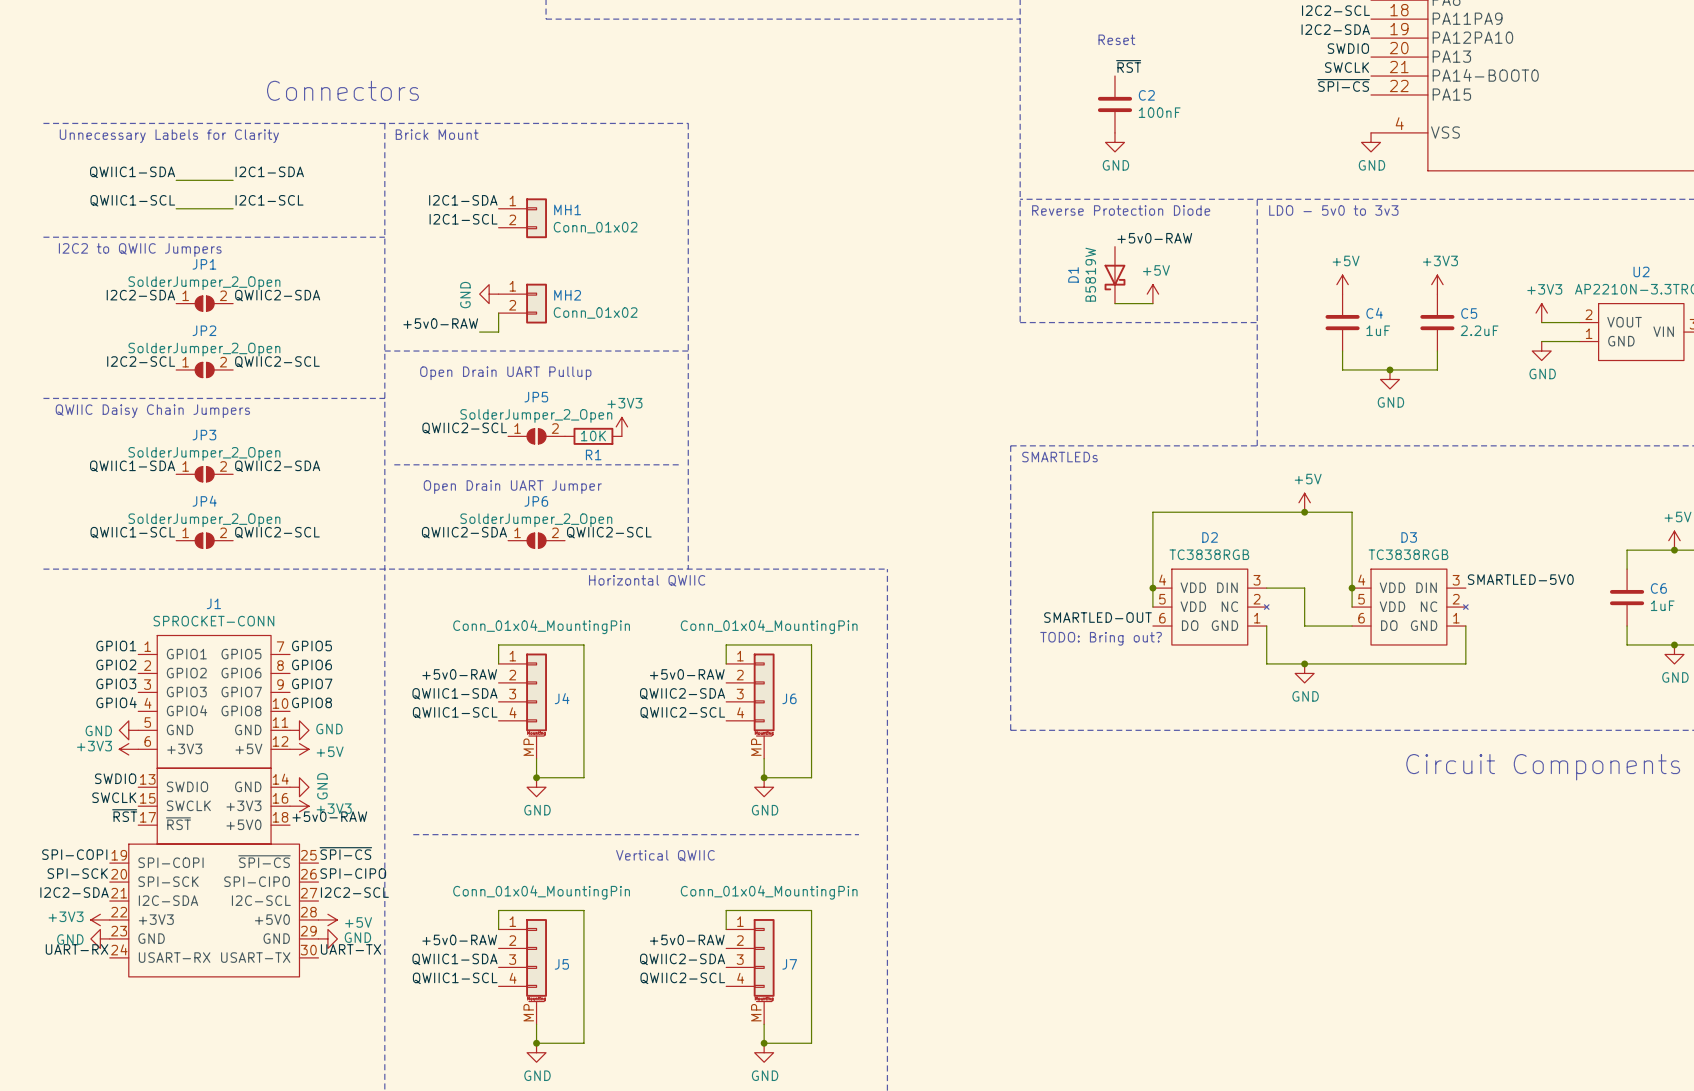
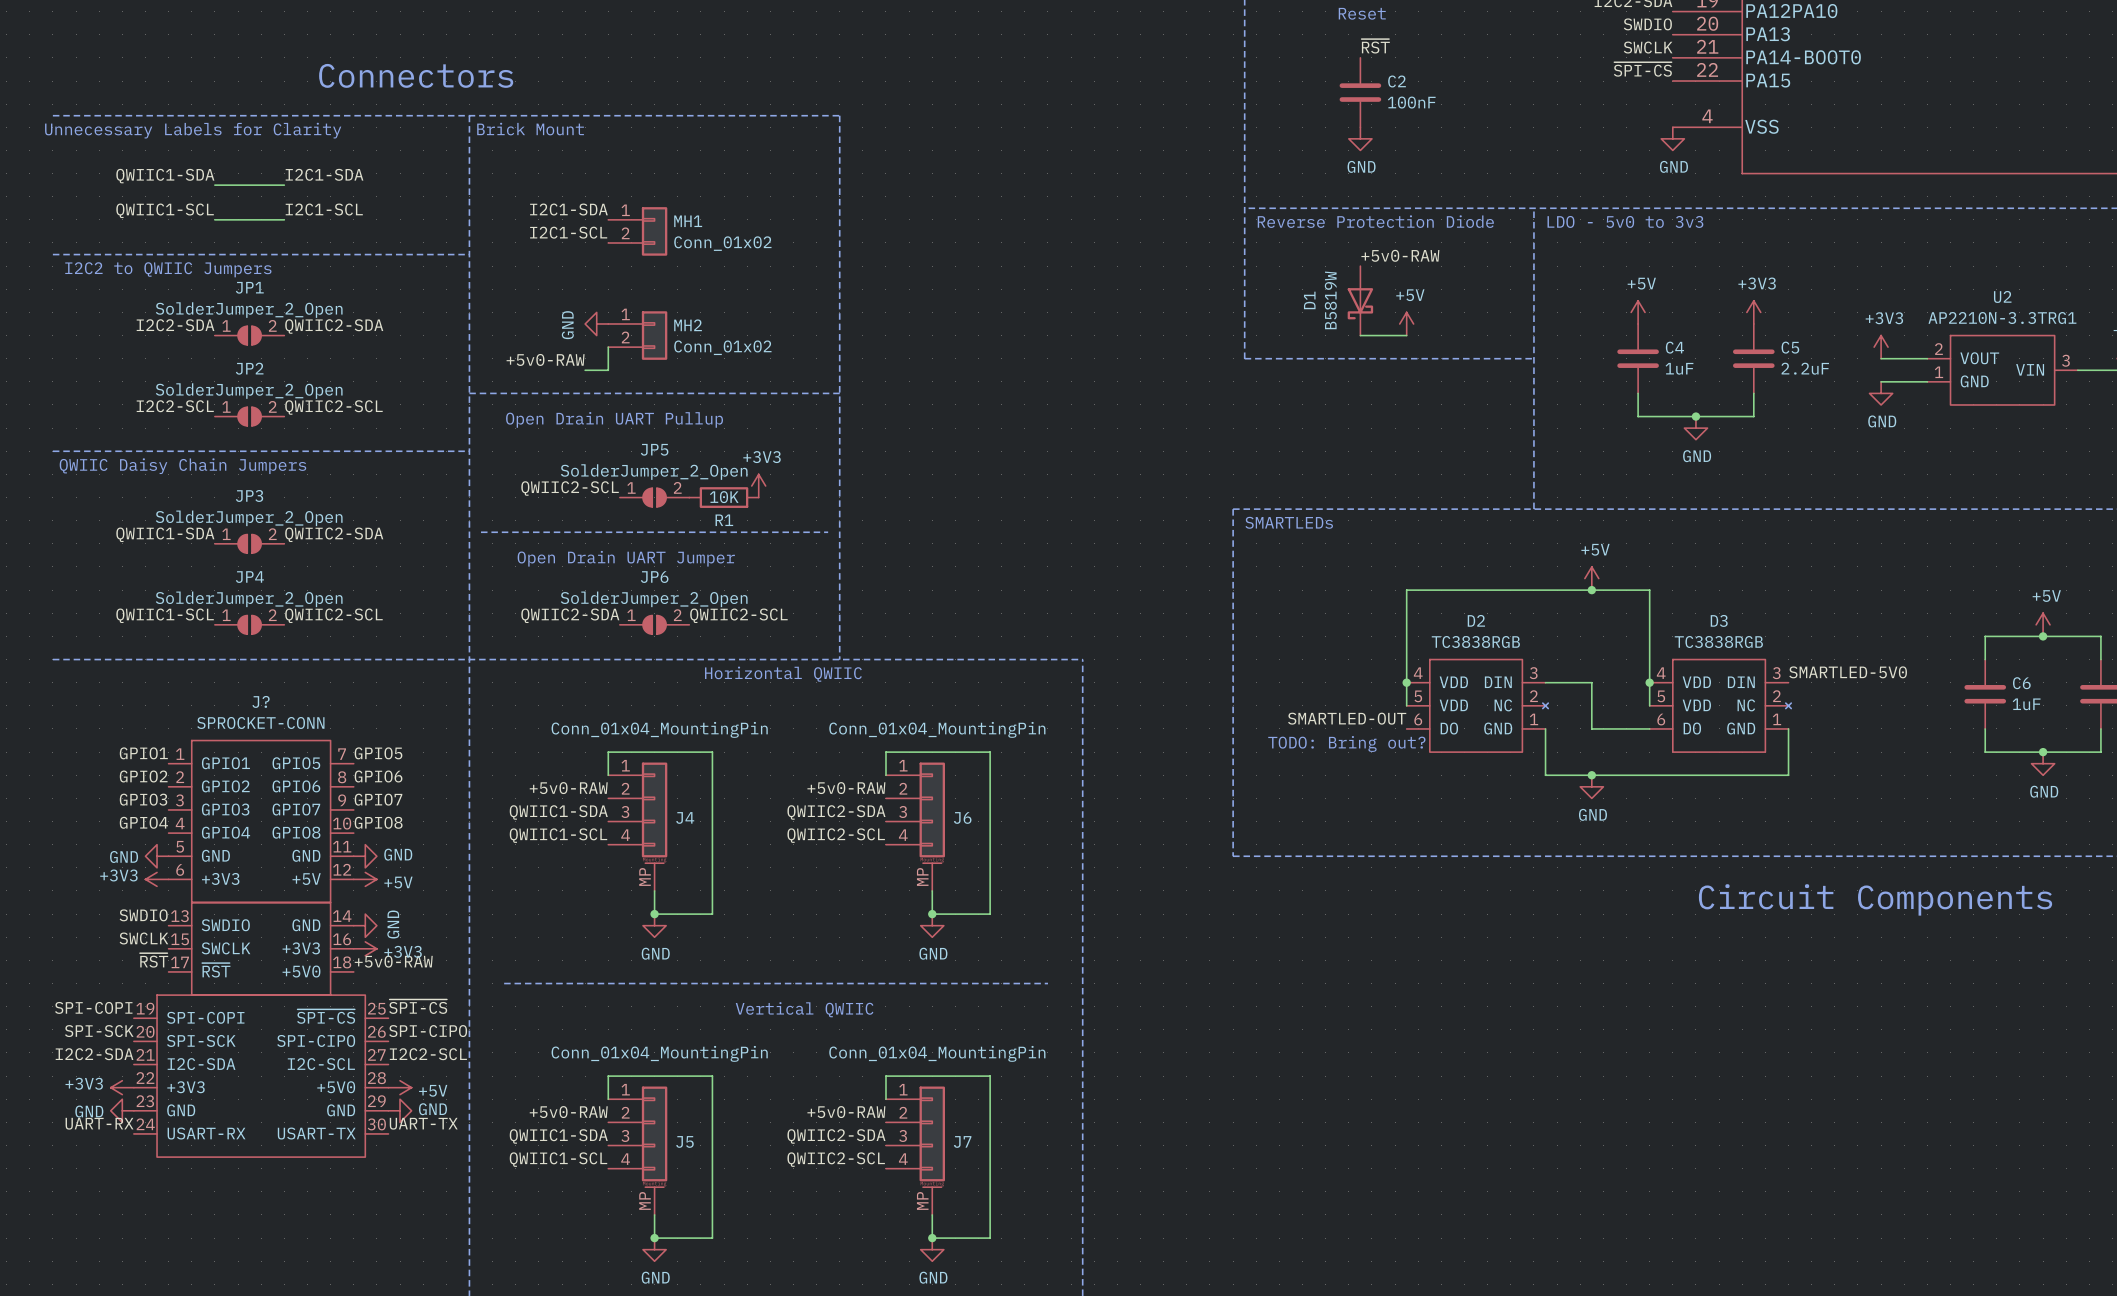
J1 name: J1 (213, 603) -> J? (261, 701)

